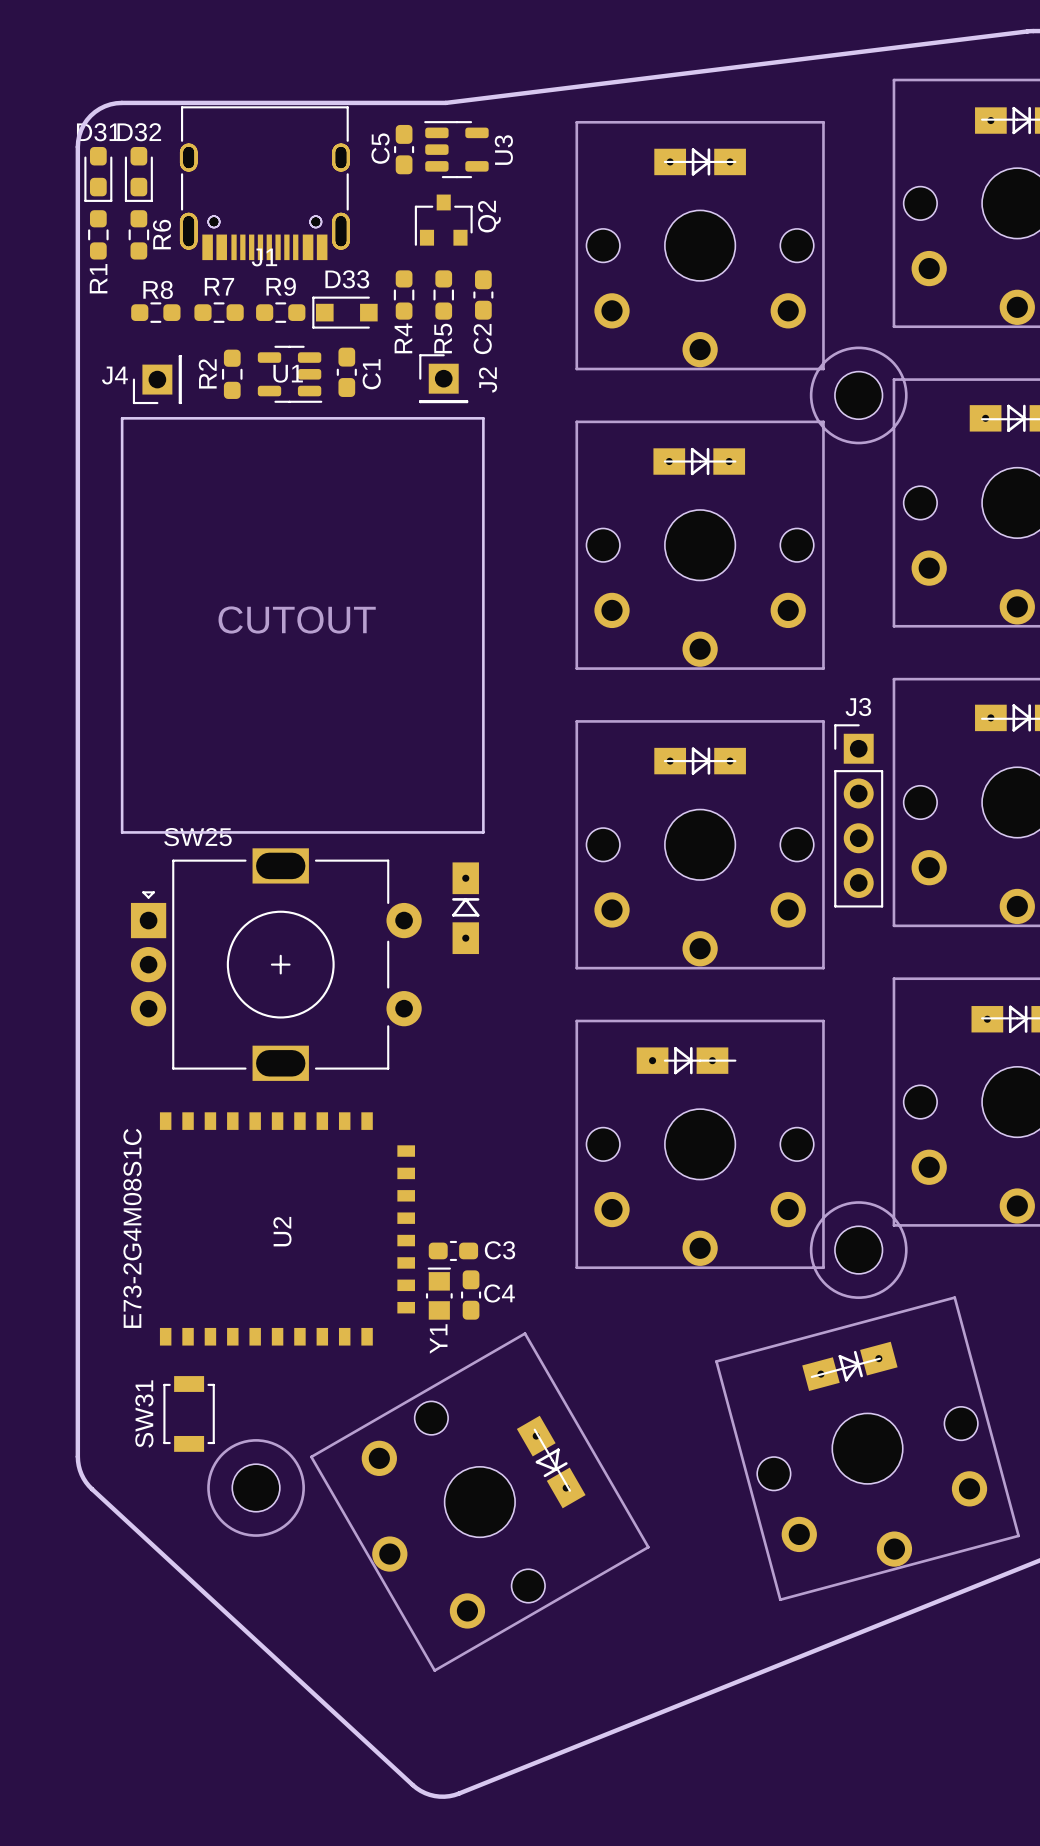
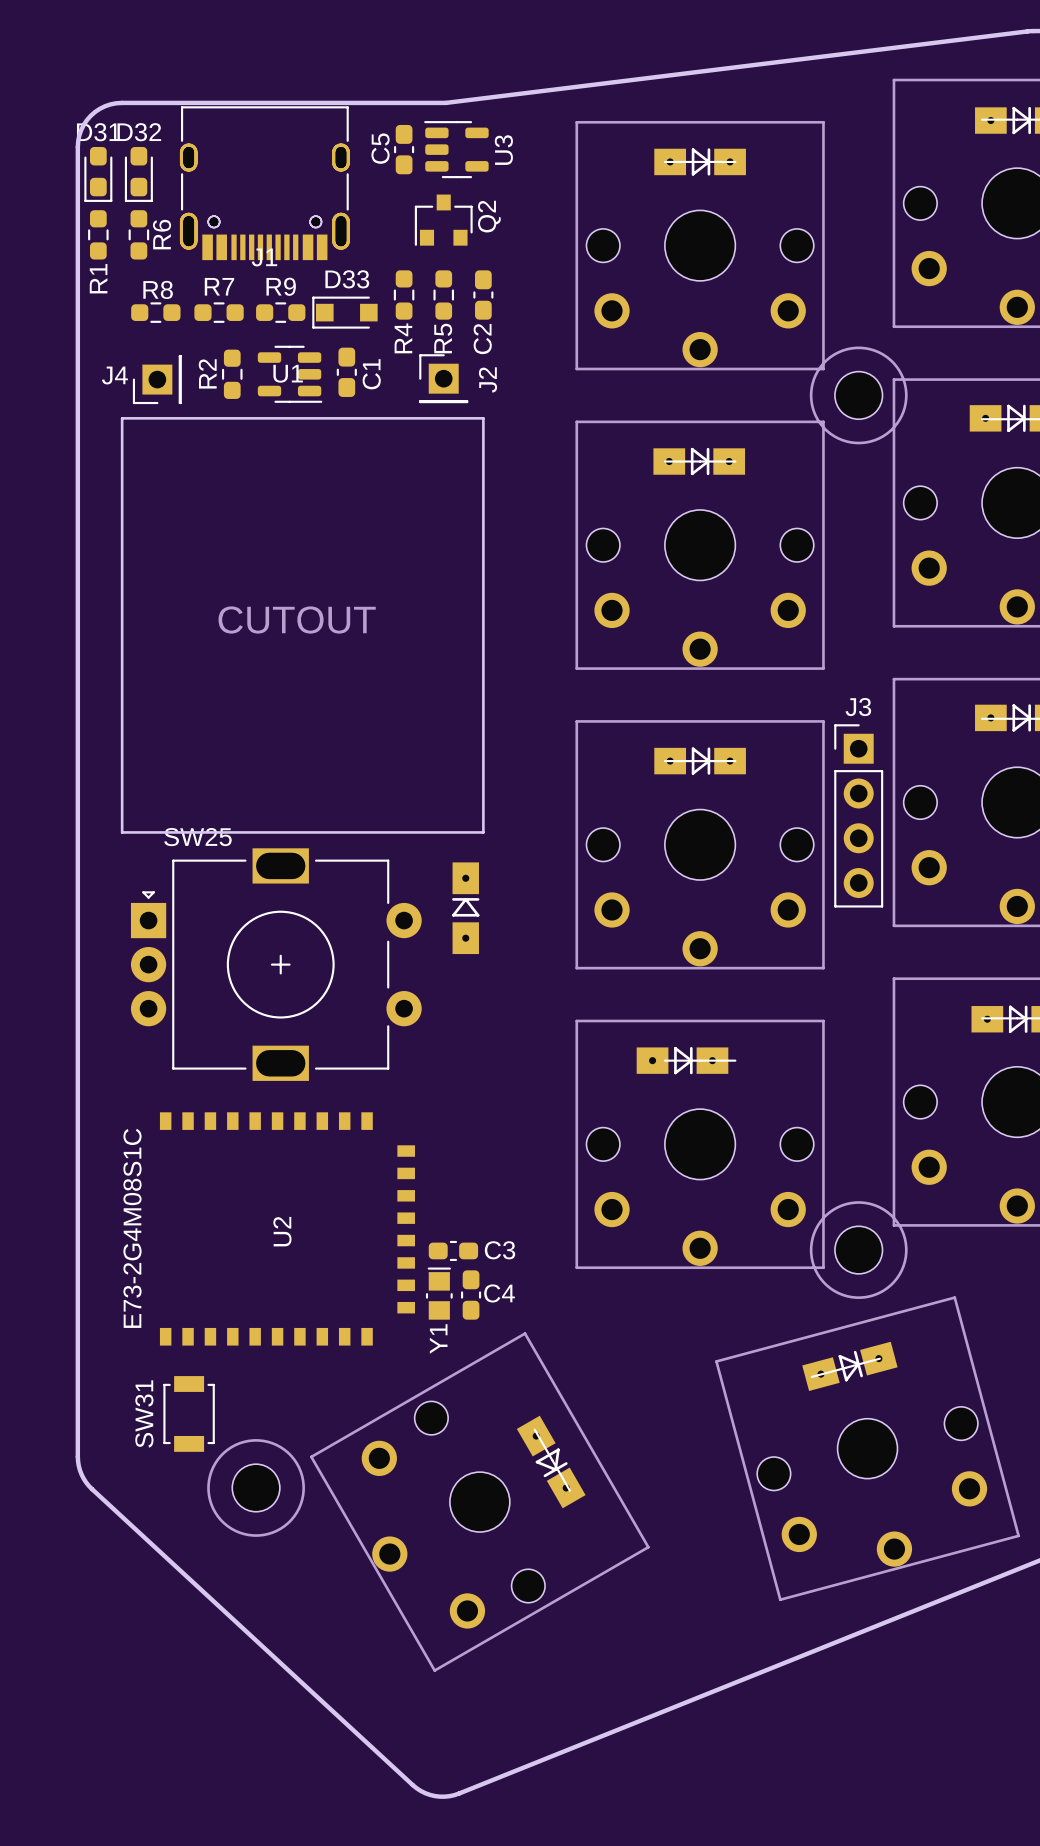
part footprint: [715, 1296, 1020, 1602] -> [715, 1296, 1020, 1602]
part footprint: [310, 1332, 650, 1672] -> [310, 1332, 650, 1672]

